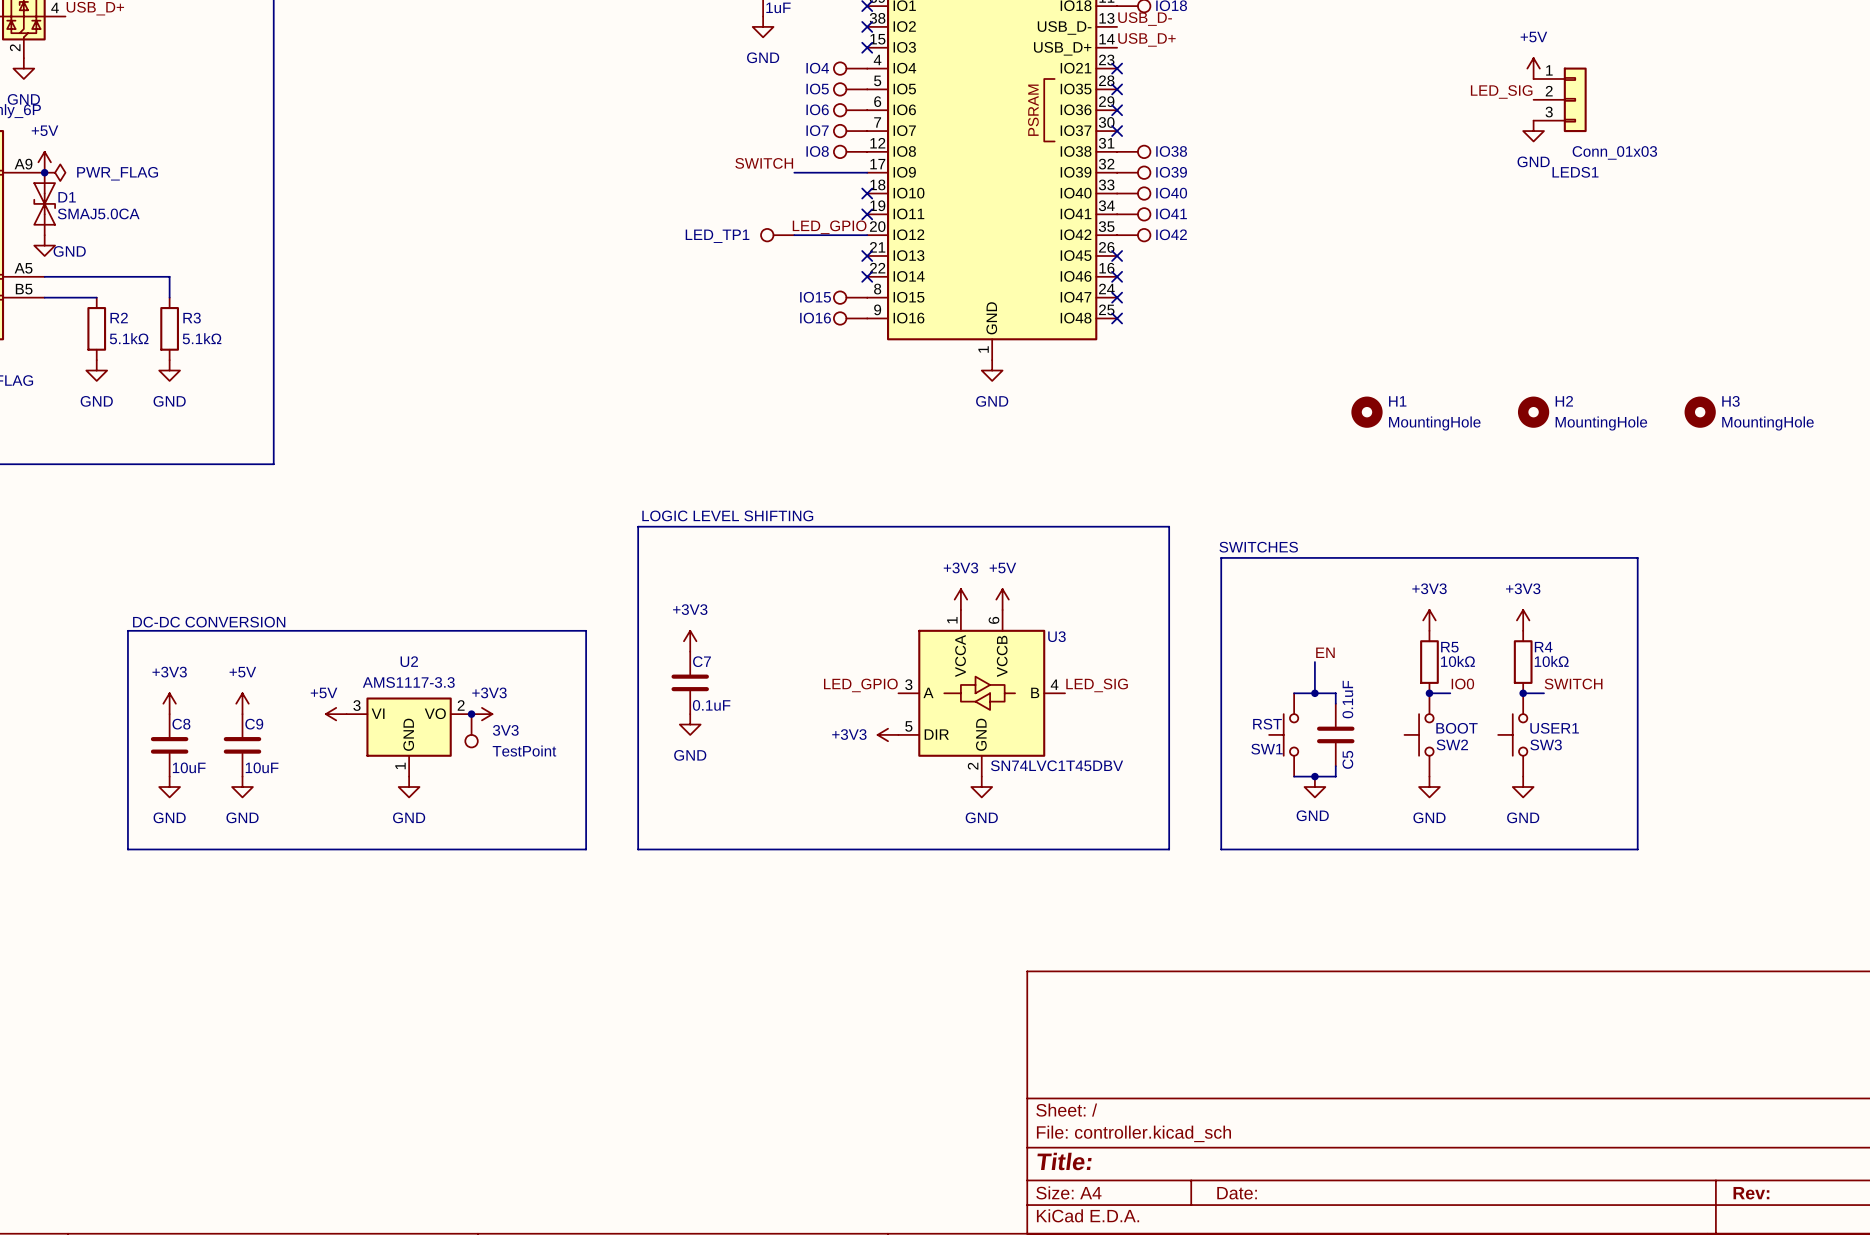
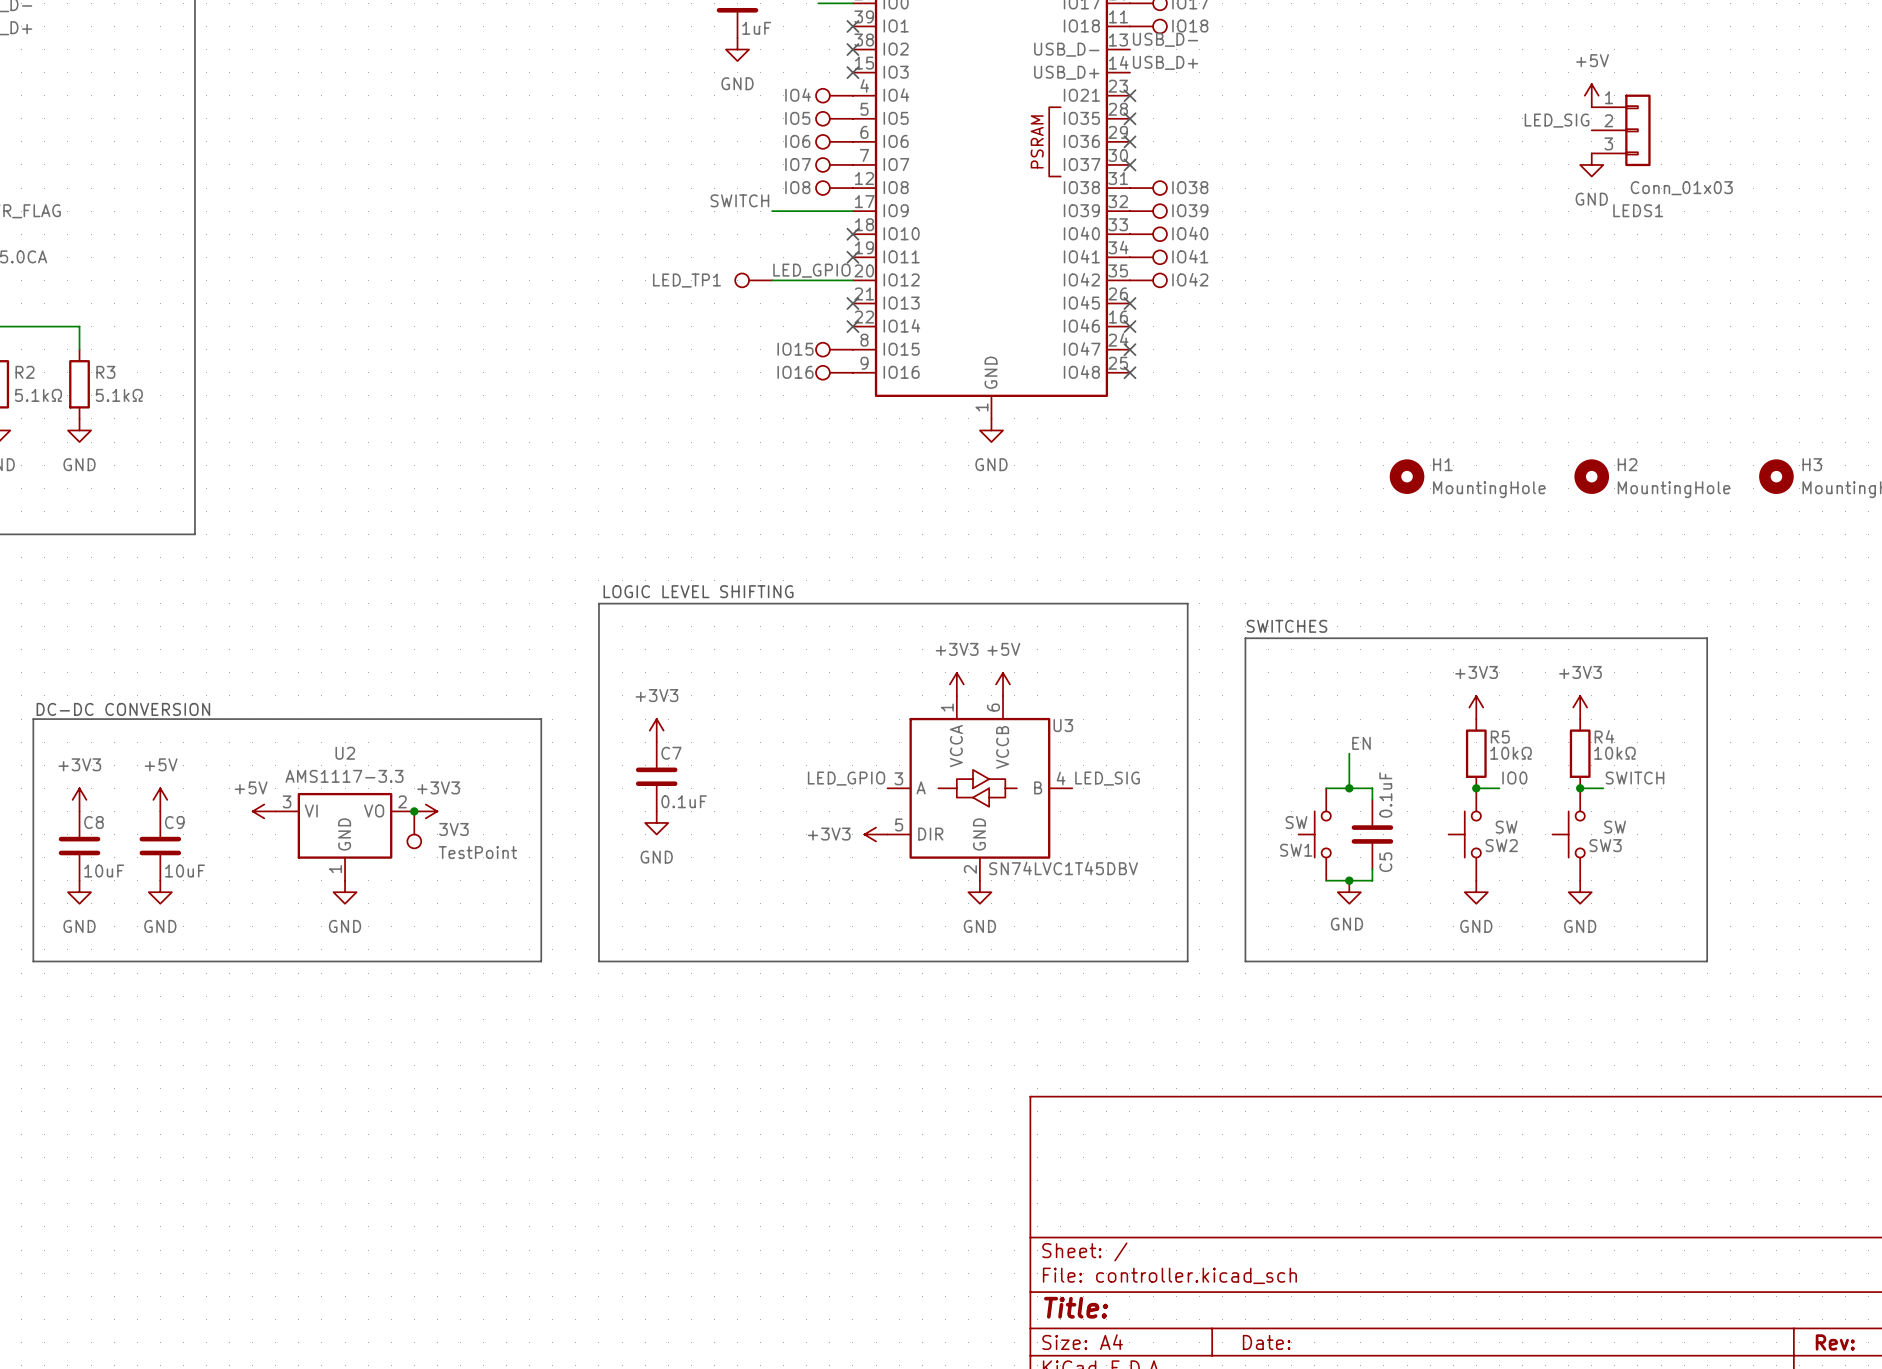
SW1 value: RST (1267, 724) -> SW (1296, 822)
SW2 value: BOOT (1456, 728) -> SW (1506, 827)
SW3 value: USER1 (1554, 728) -> SW (1615, 827)

